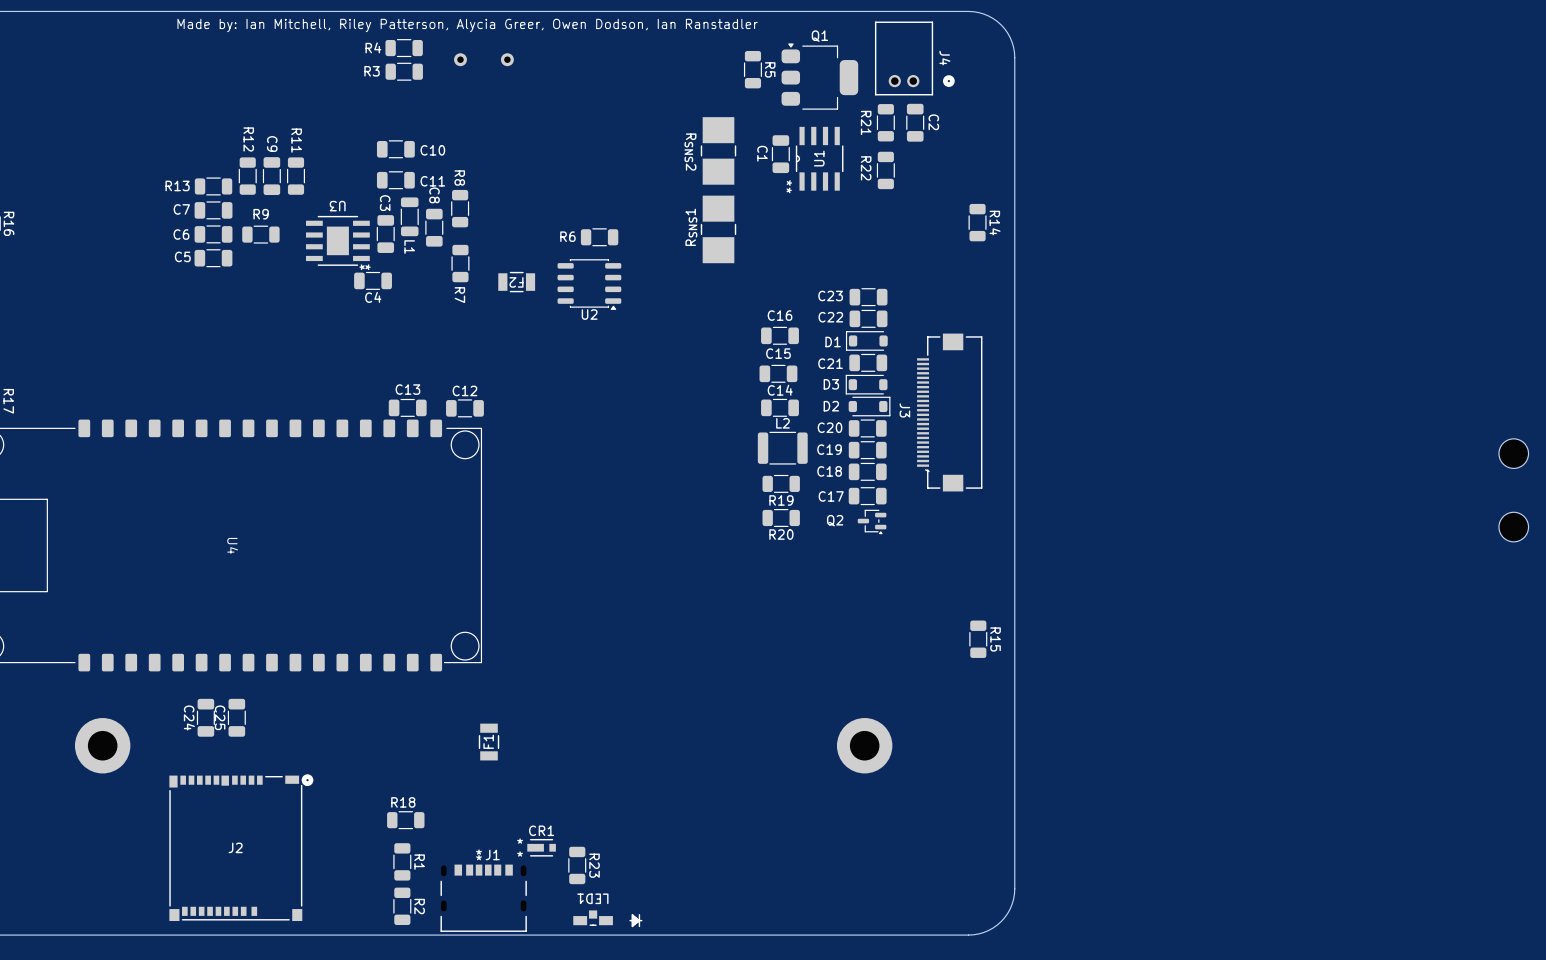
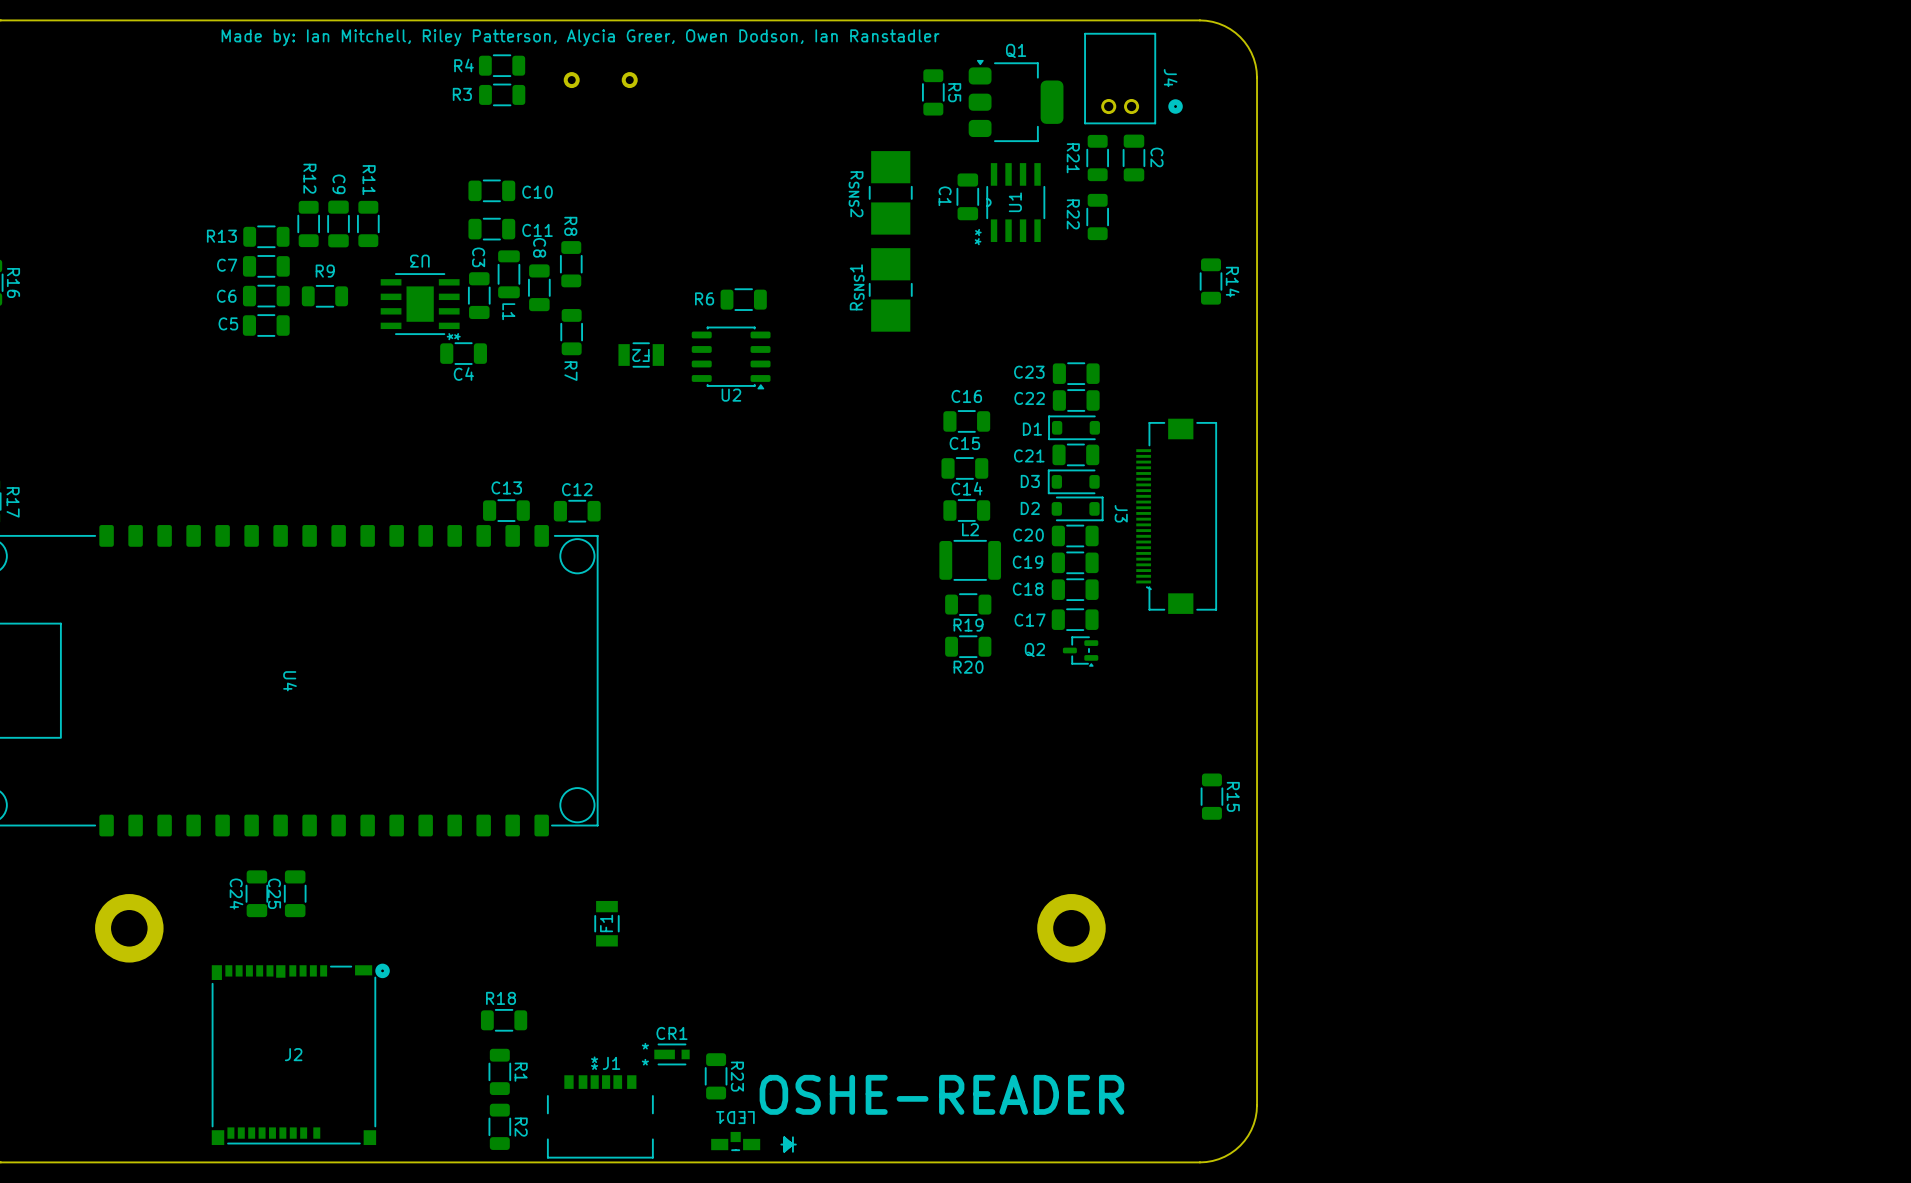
part: (1513, 453) -> none
part: (1513, 527) -> none
text: none -> OSHE-READER (941, 1094)

